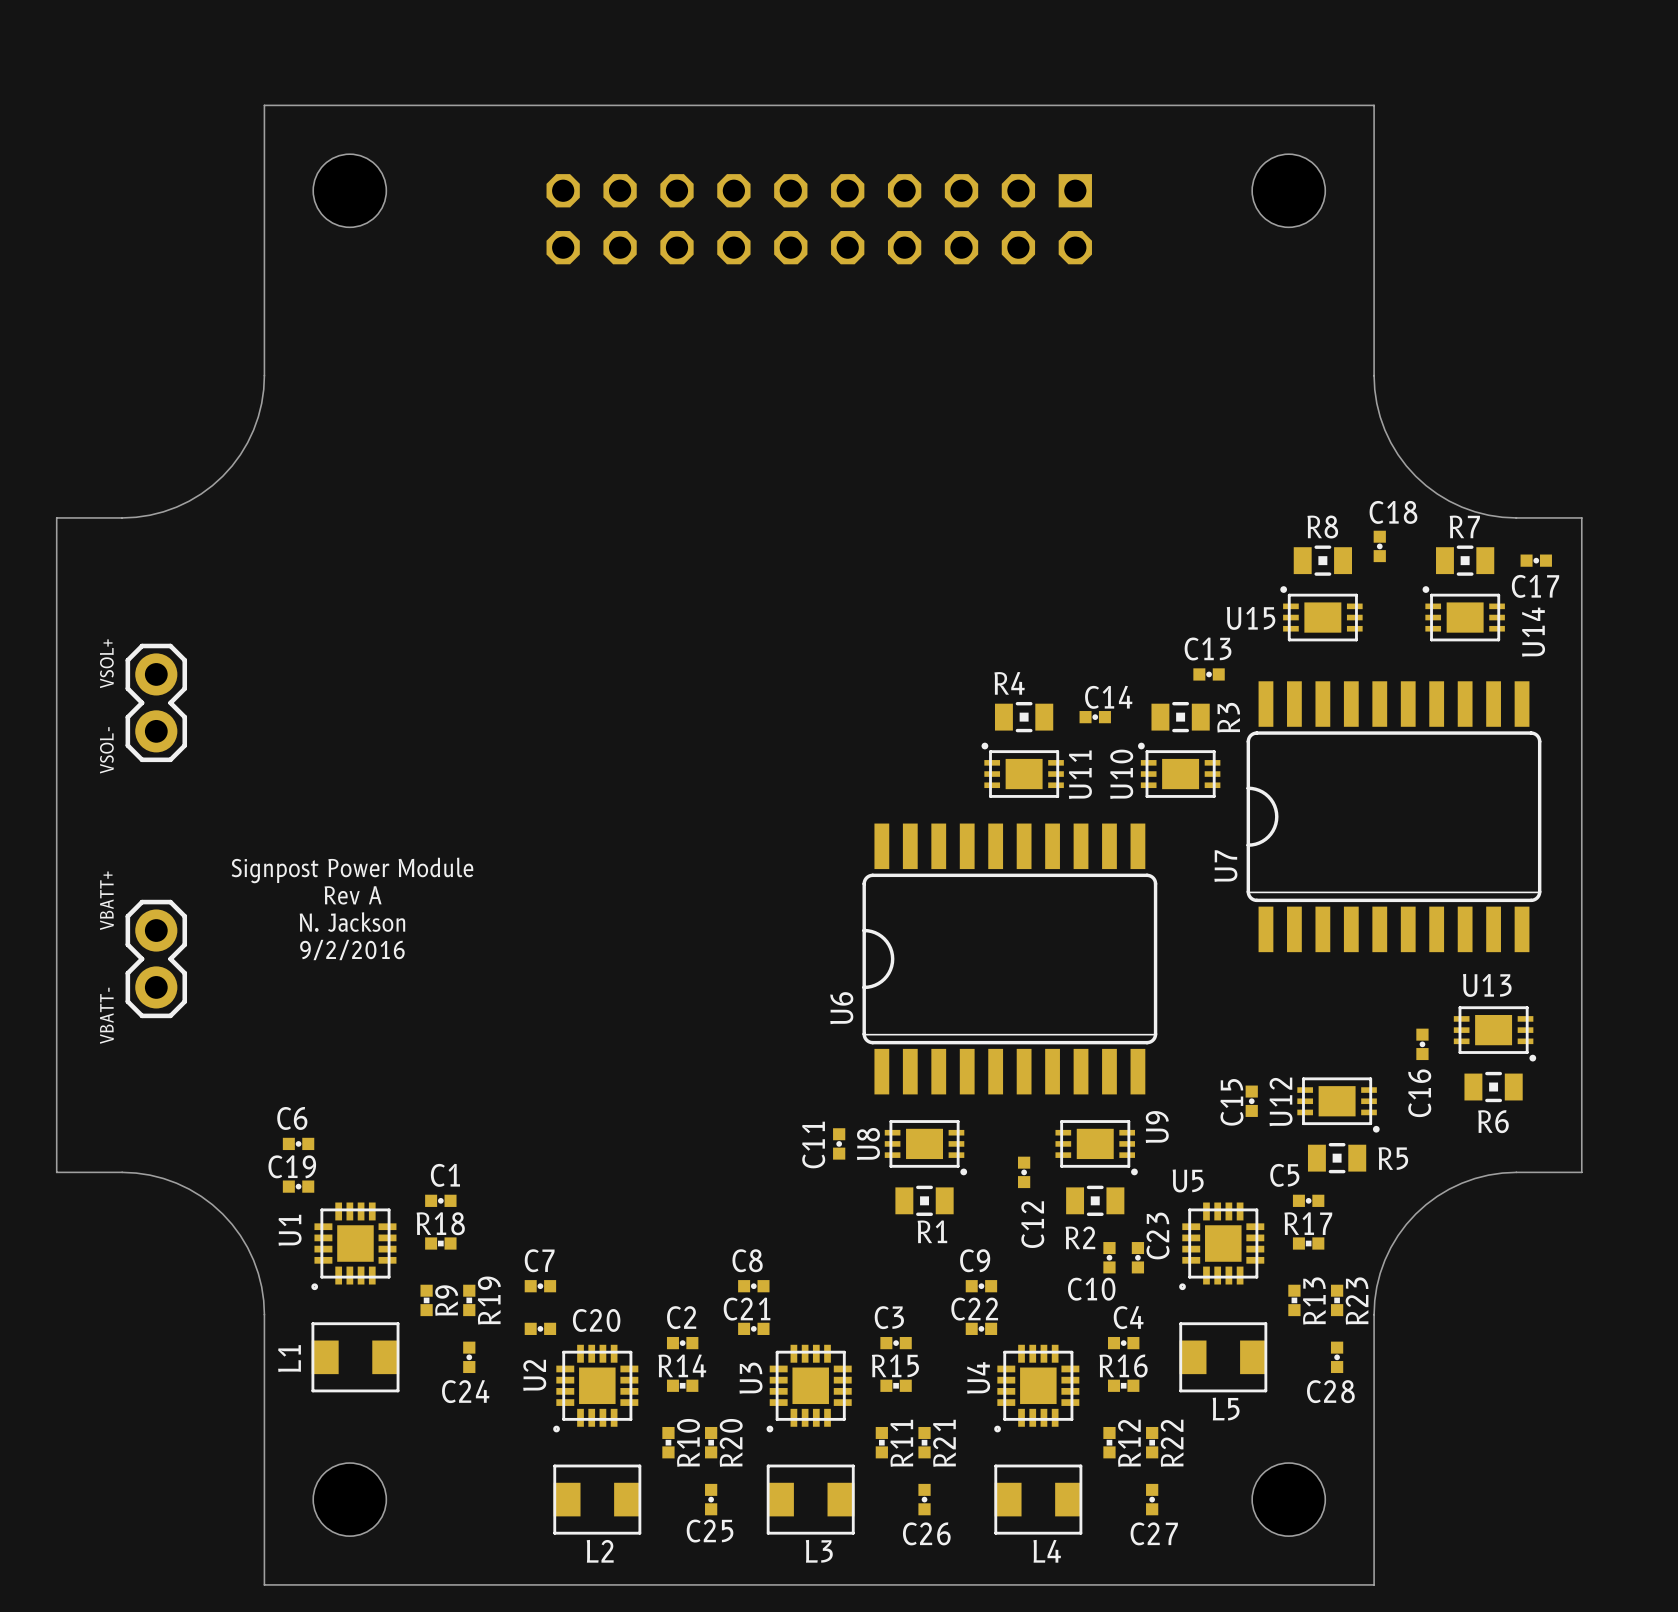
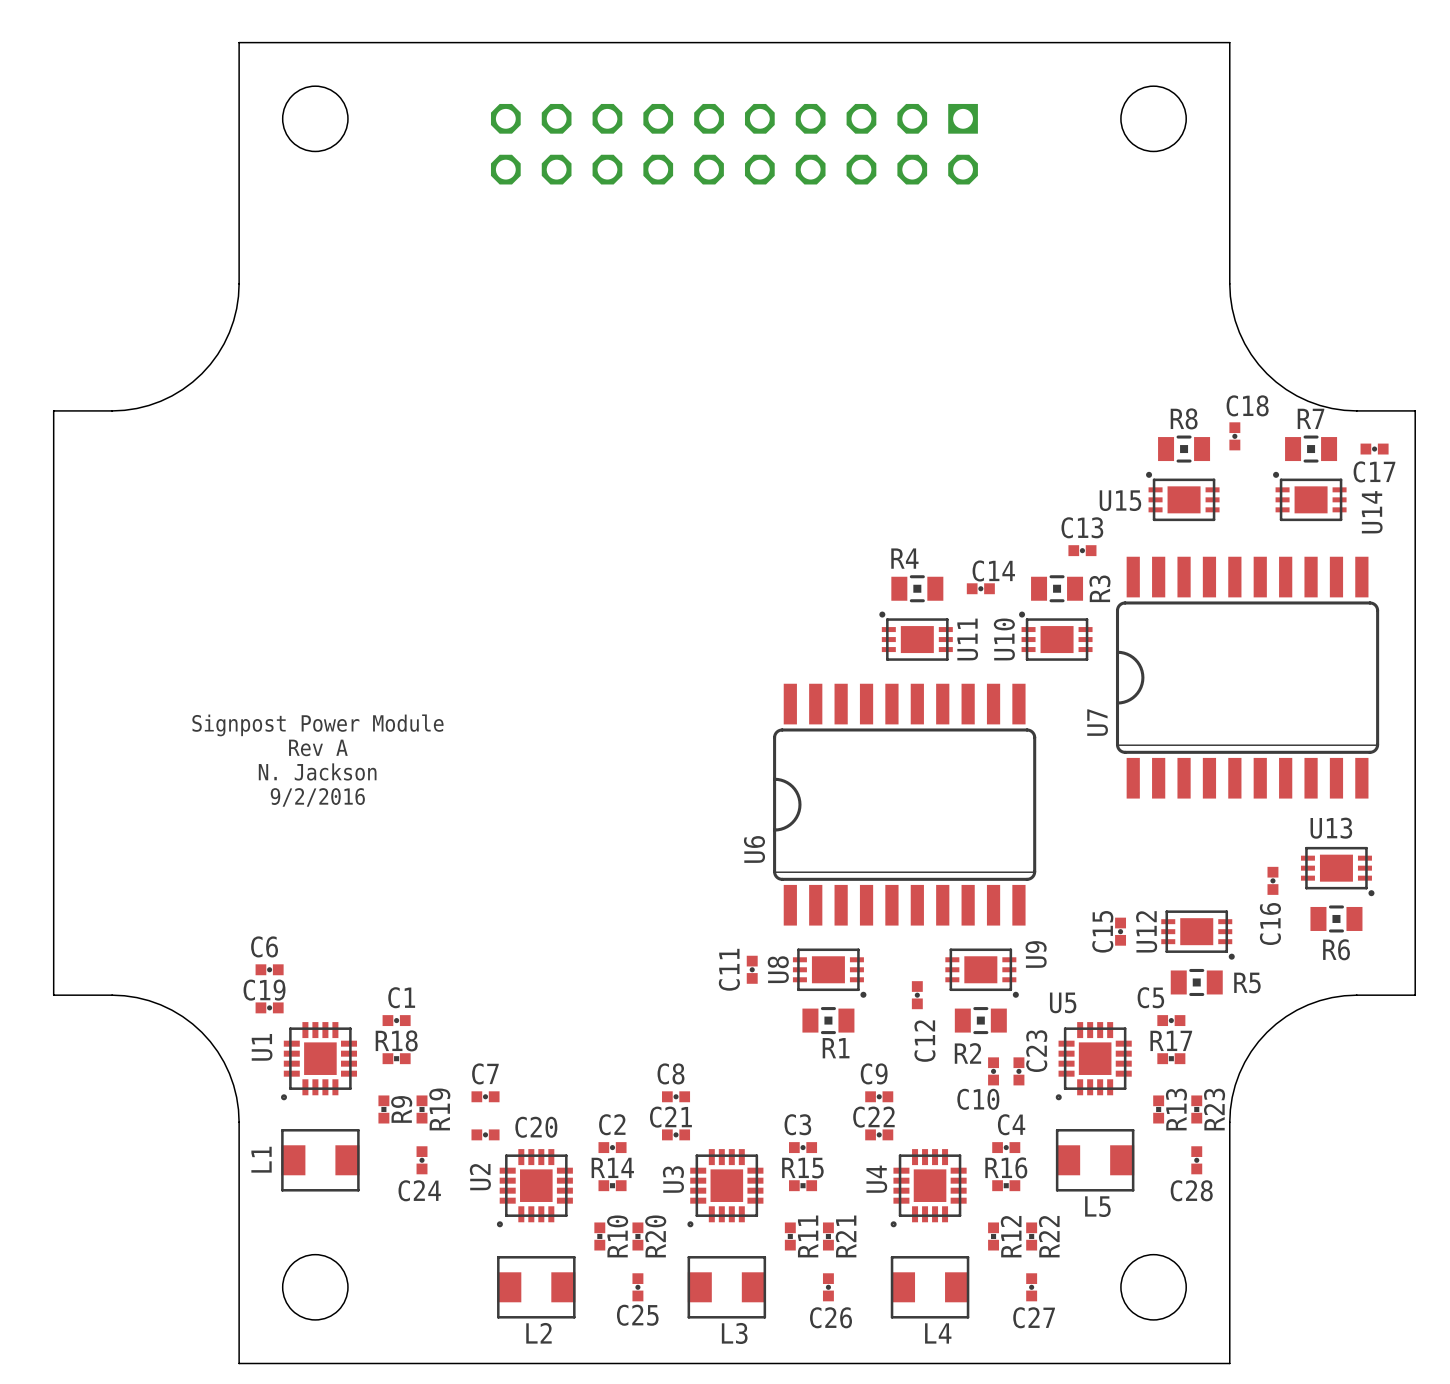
text: VSOL+ (106, 663) -> none
part: (156, 702) -> none
text: VSOL- (106, 750) -> none
text: VBATT+ (106, 900) -> none
part: (156, 958) -> none
text: VBATT- (106, 1015) -> none

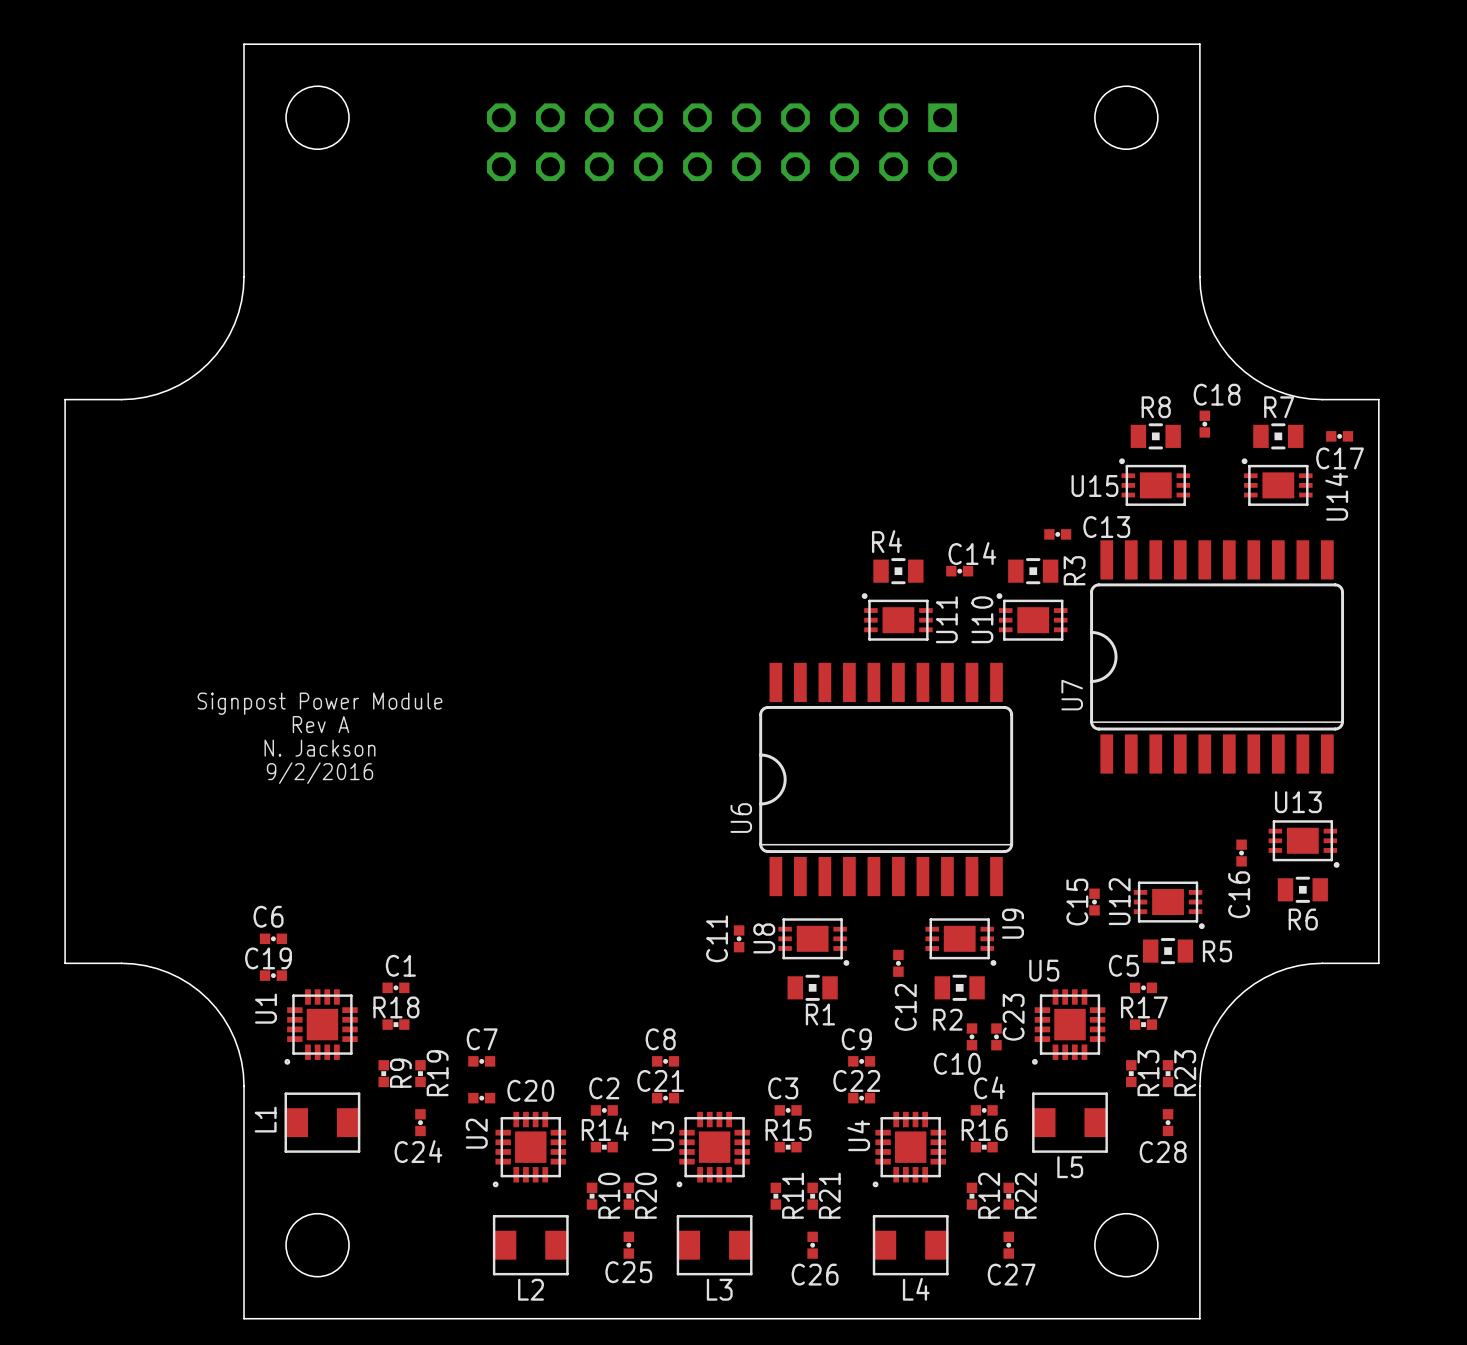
C13 name position: C13 (1082, 527) -> C13 (1106, 527)

